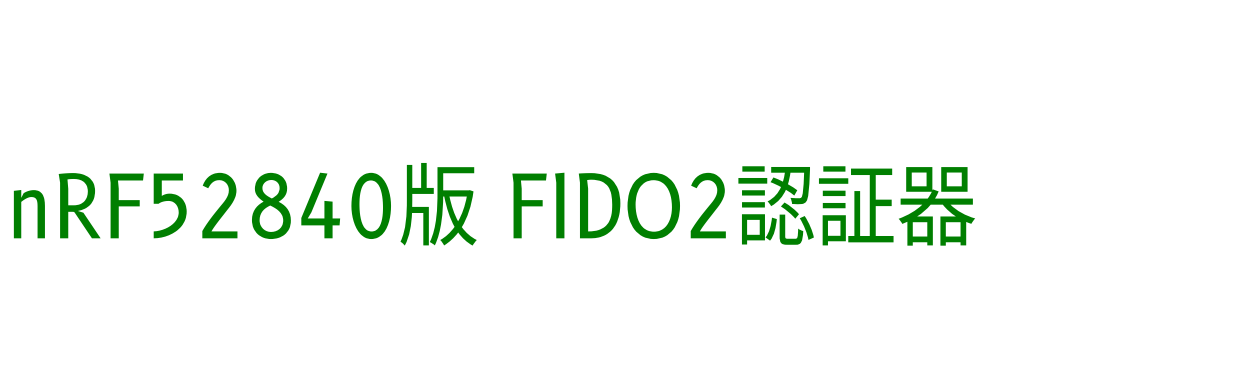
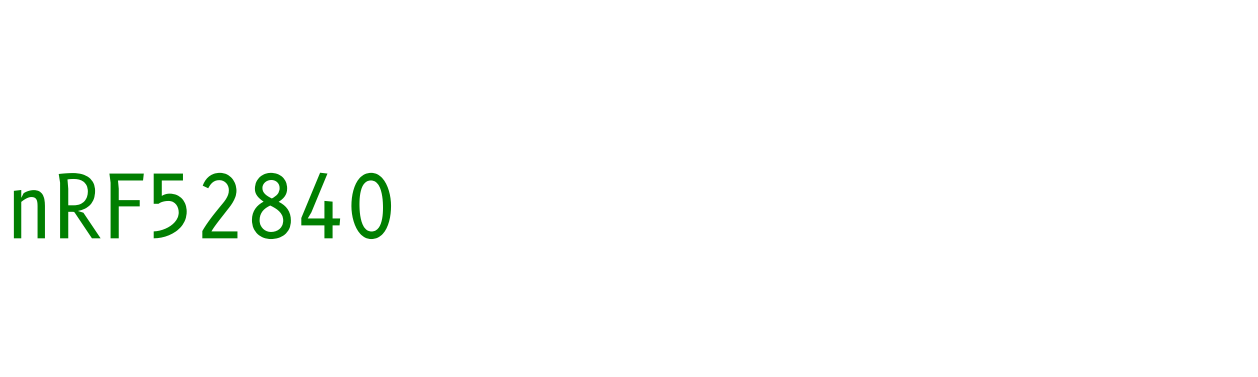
text: nRF52840版 FIDO2認証器 (494, 204) -> nRF52840 (202, 205)

